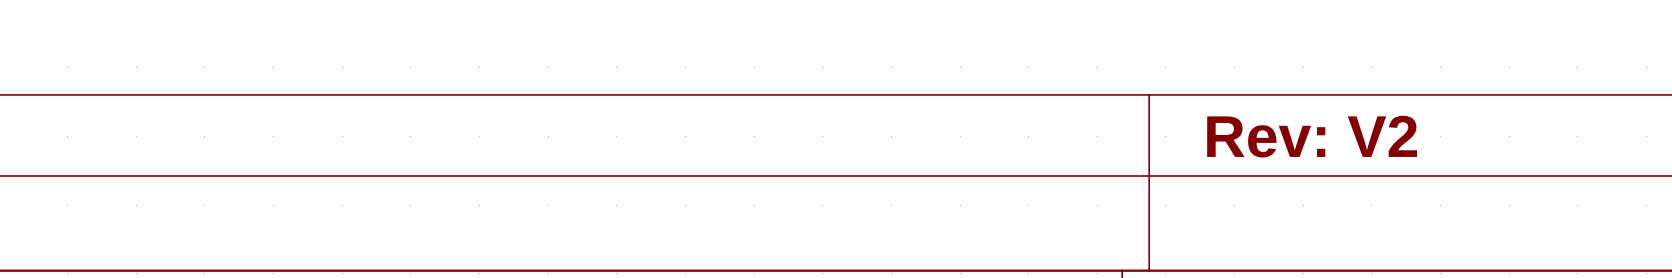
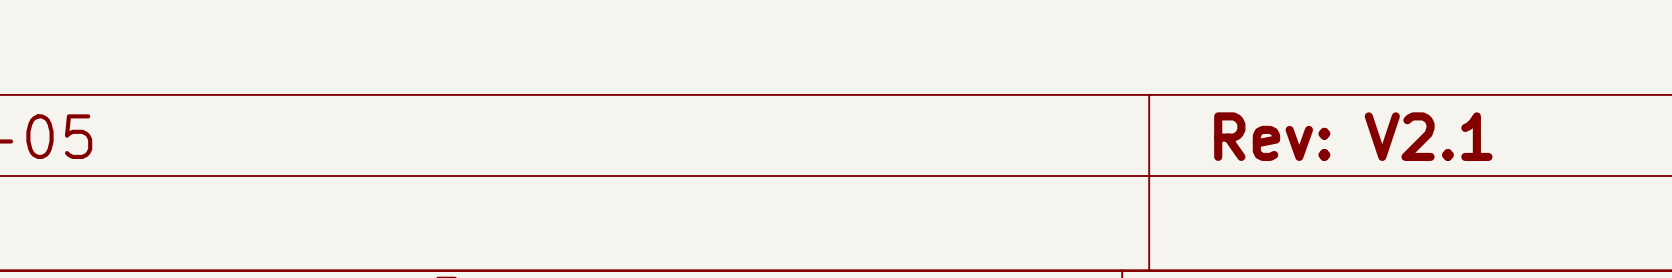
title block: Rev: V2 (1312, 136) -> Rev: V2.1 (1353, 136)

